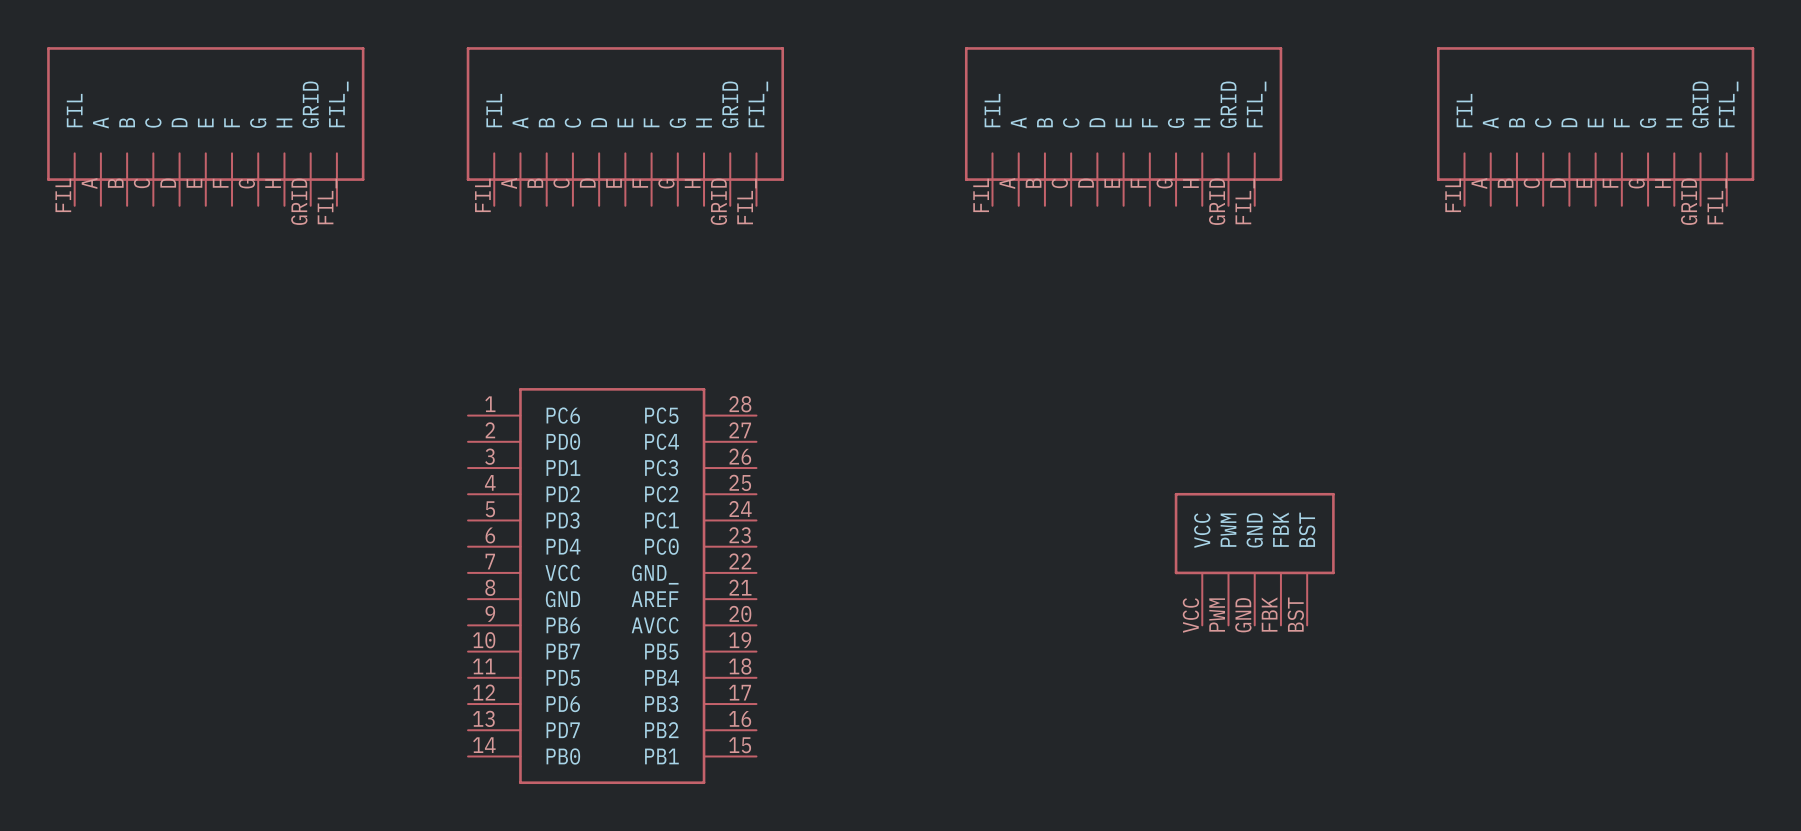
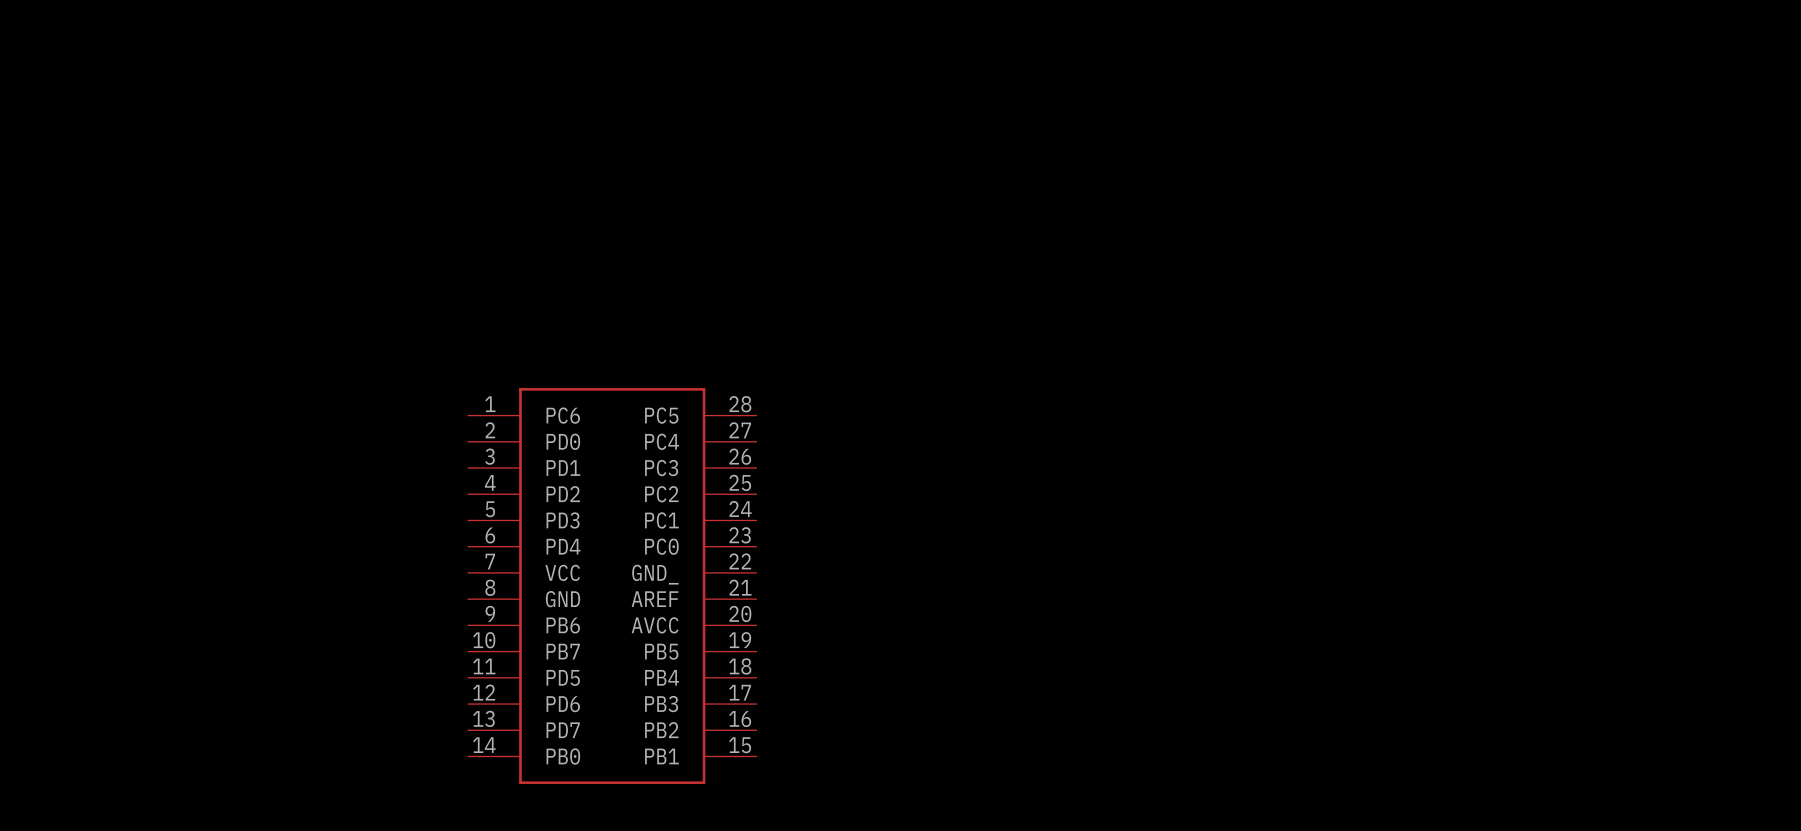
part: (205, 126) -> none
part: (625, 126) -> none
part: (1123, 126) -> none
part: (1595, 126) -> none
part: (1254, 559) -> none

